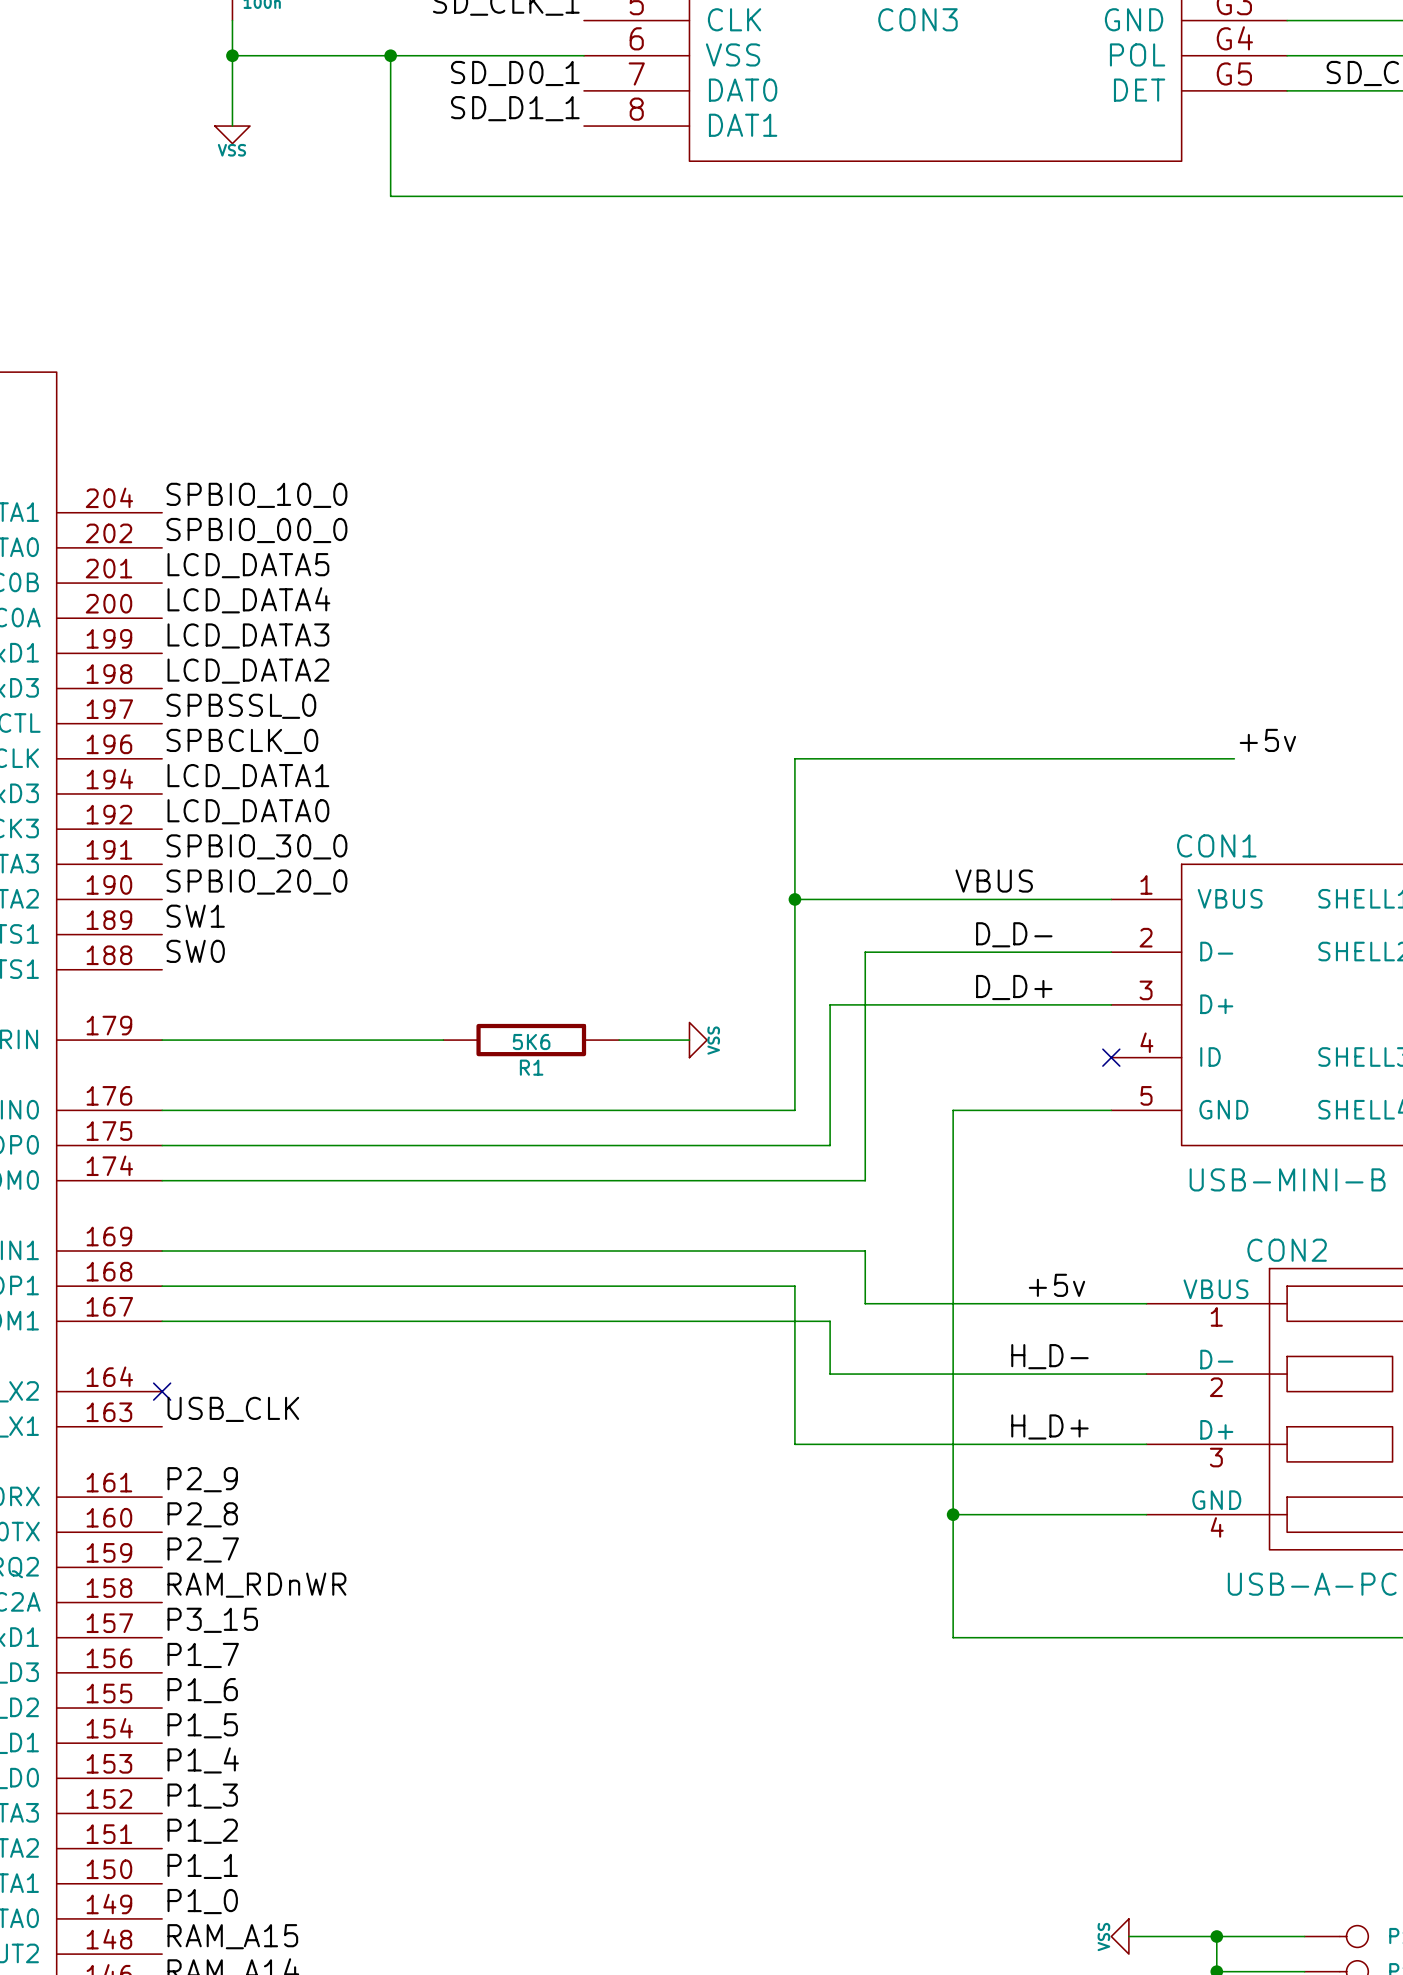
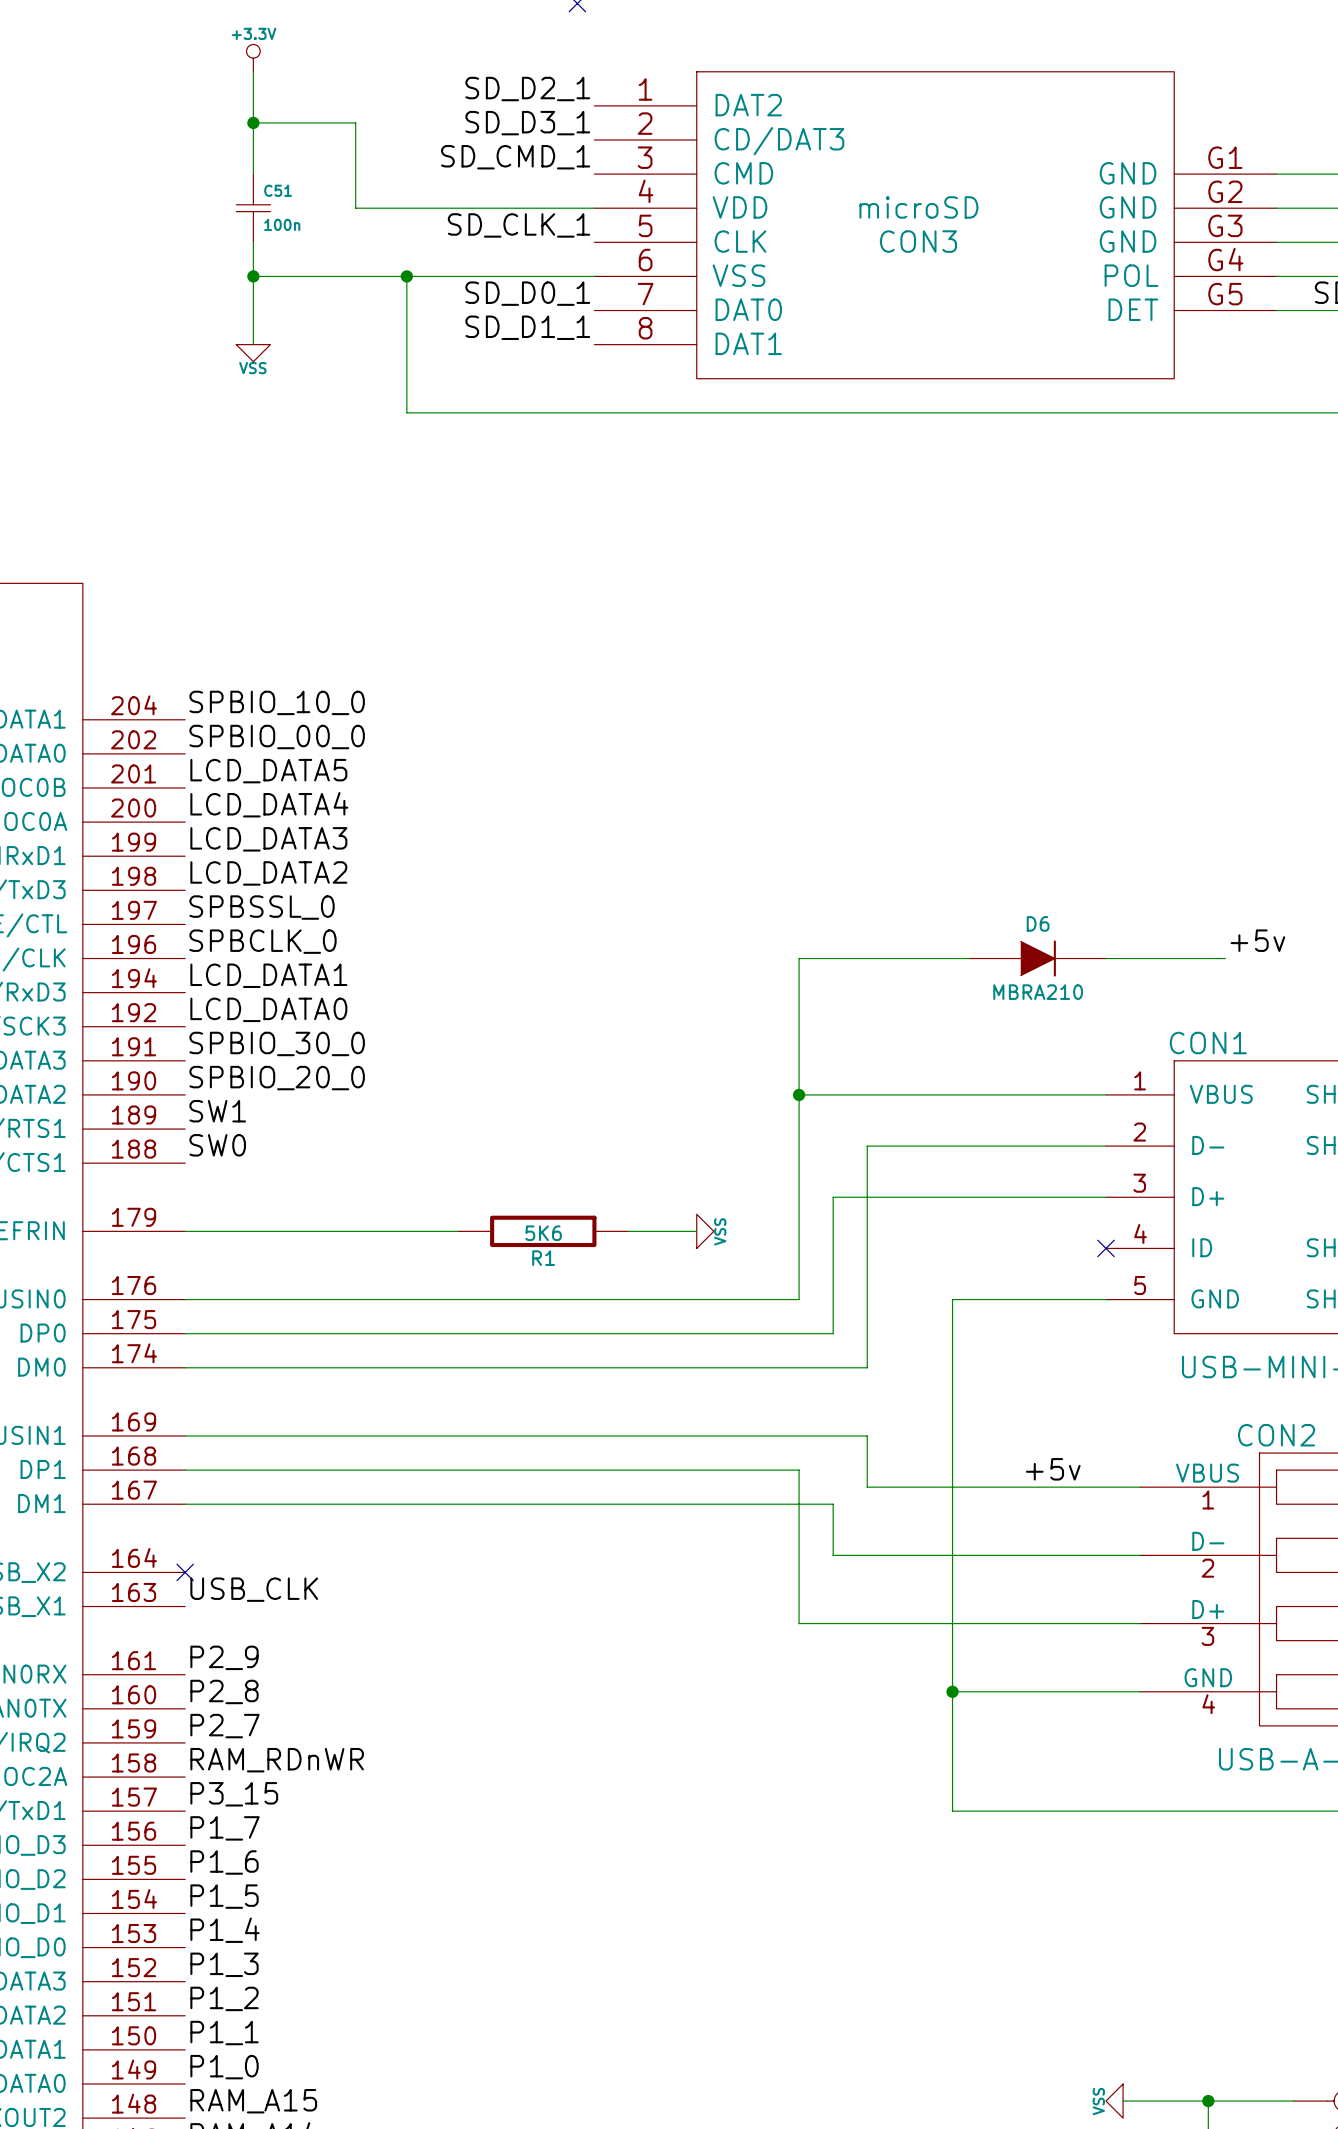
D6: none -> MBRA210 (1037, 958)
label: VBUS (994, 881) -> none
label: D_D- (1014, 934) -> none
label: D_D+ (1014, 987) -> none
label: H_D- (1049, 1356) -> none
label: H_D+ (1049, 1426) -> none

